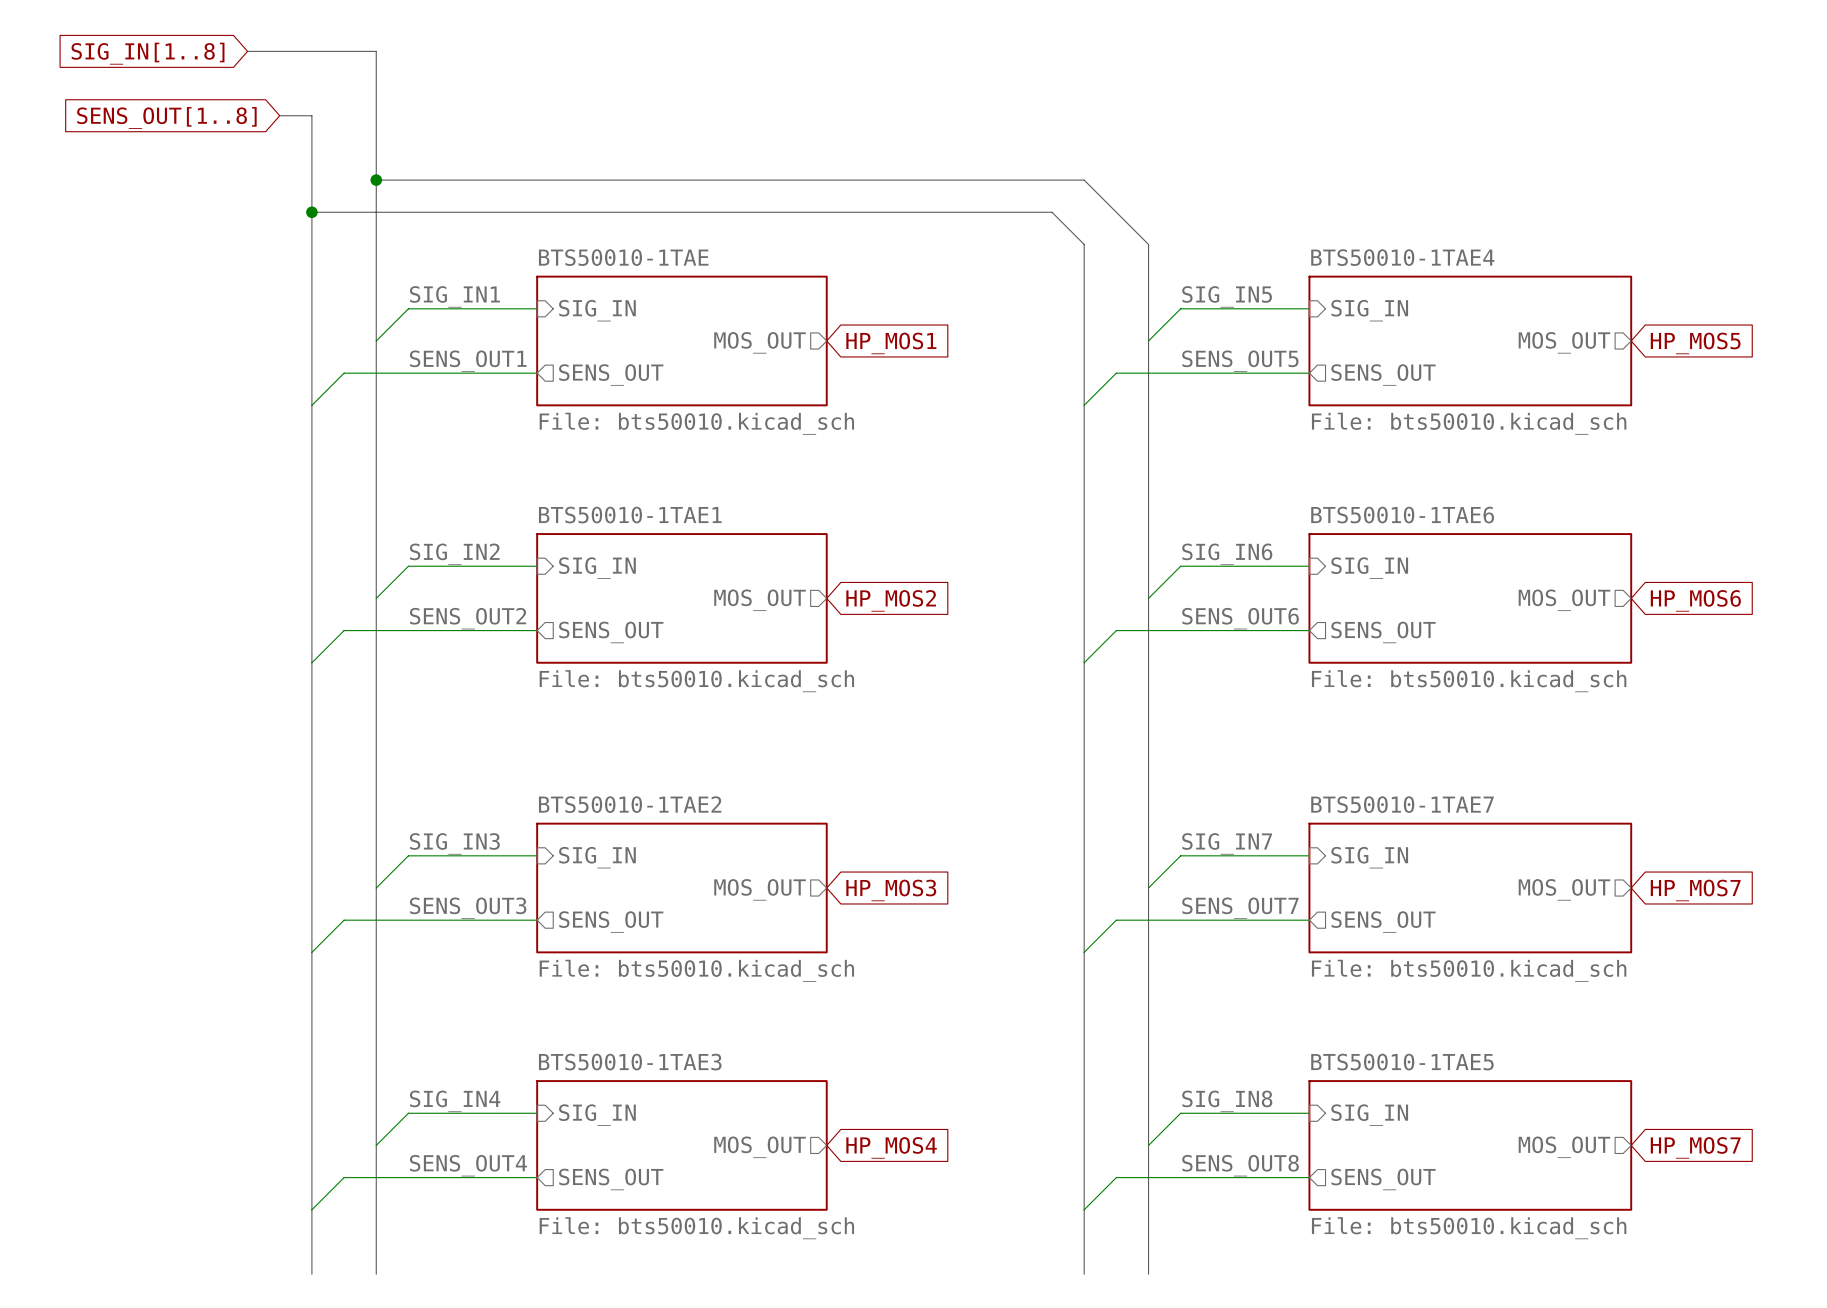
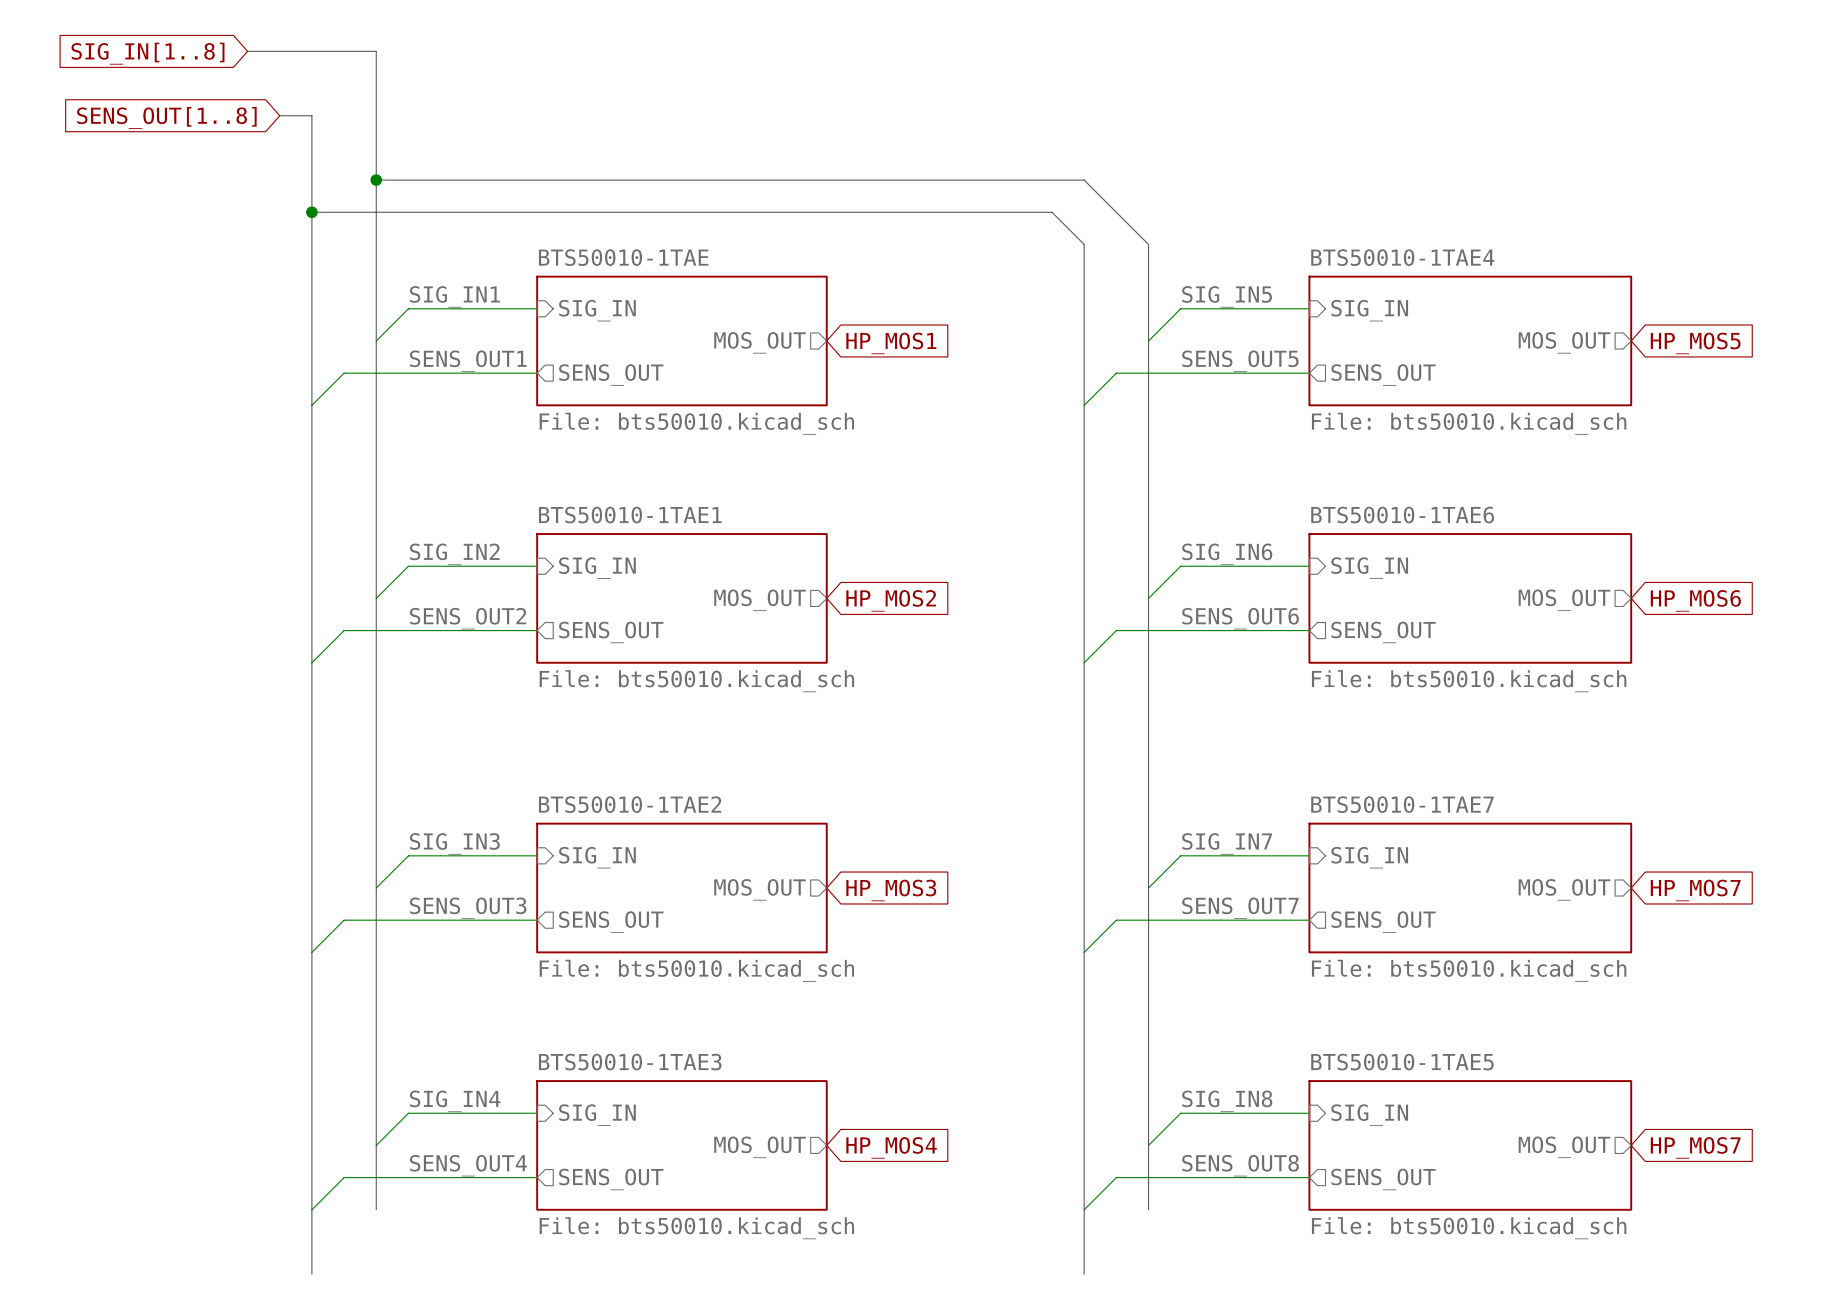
bus: (376, 1209) (376, 1274) -> none
bus: (1148, 1209) (1148, 1274) -> none

